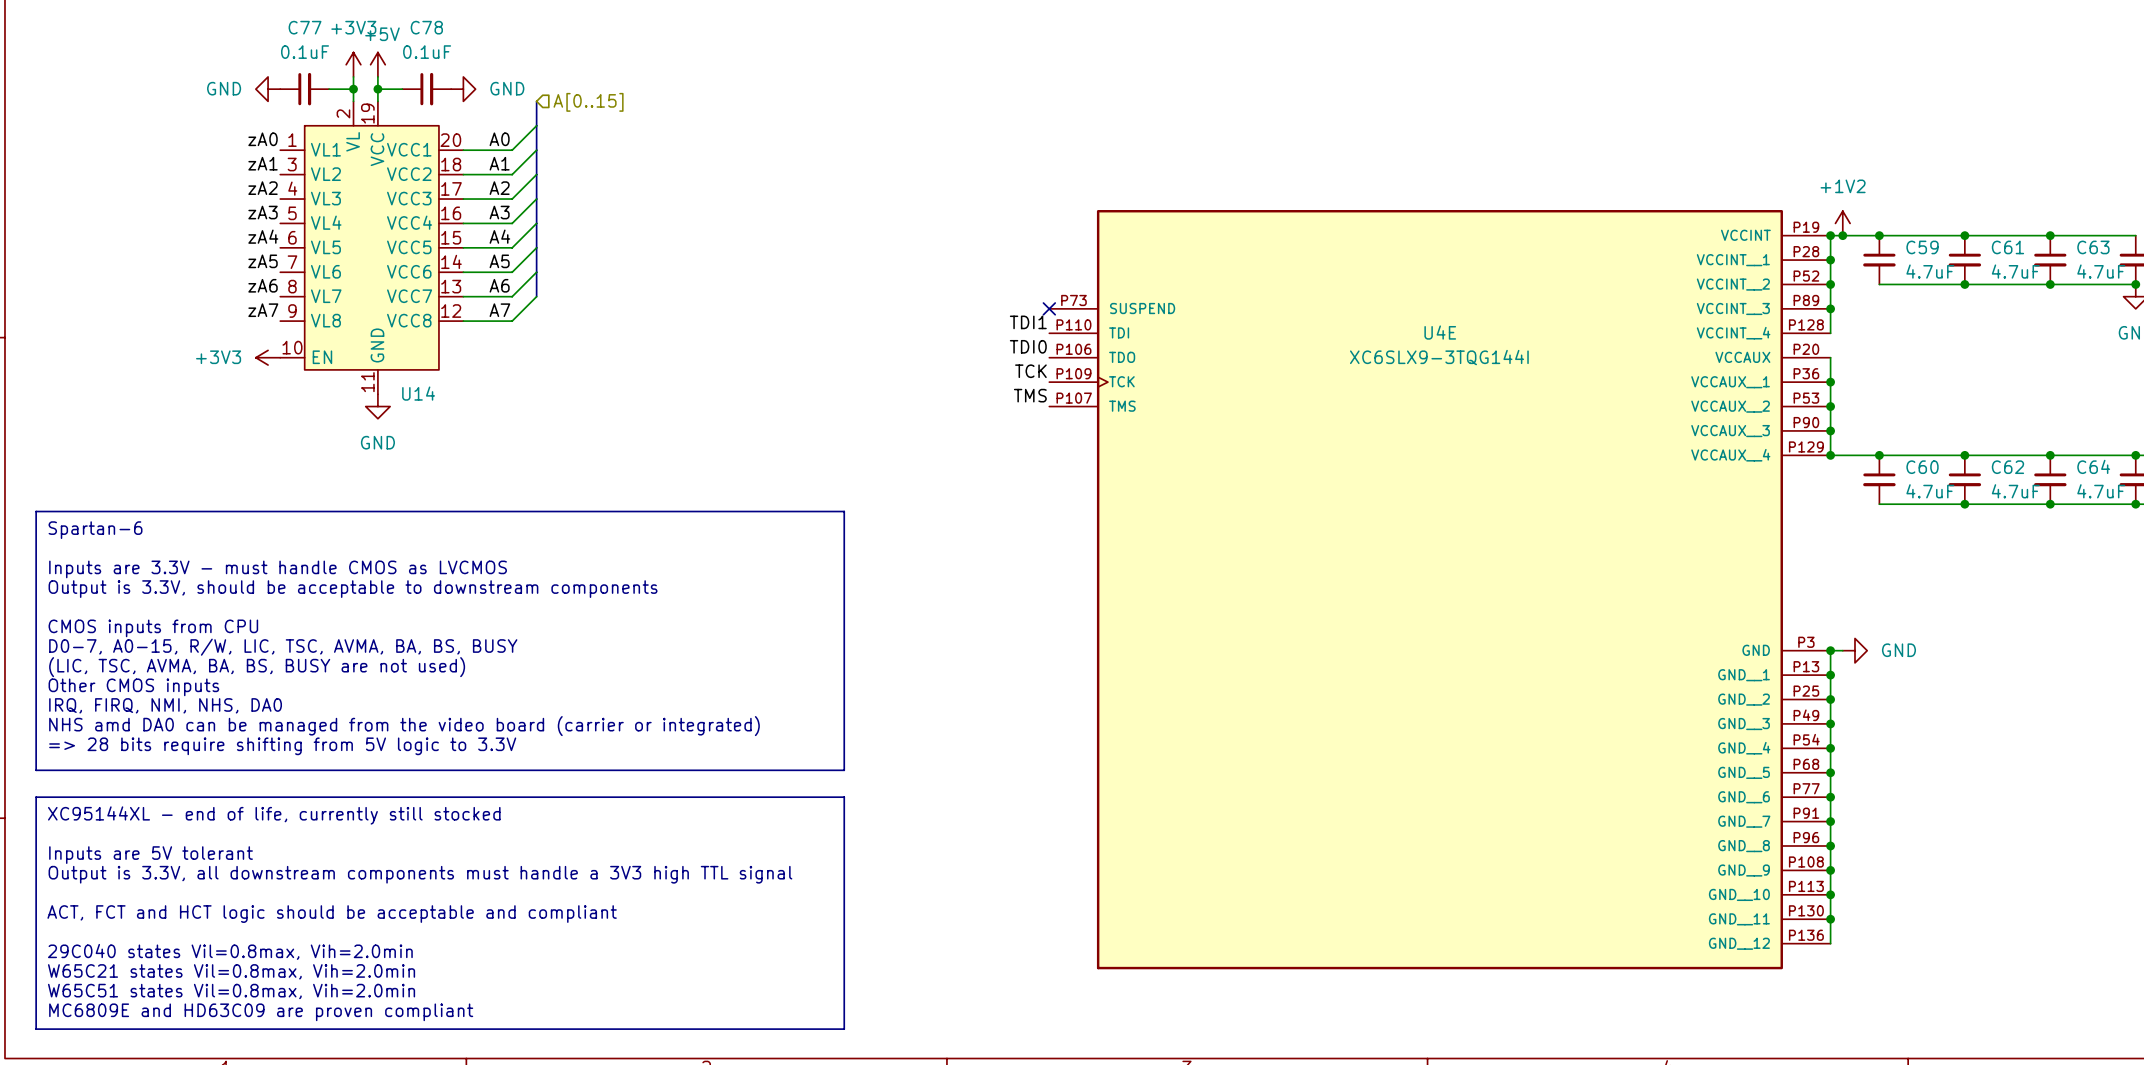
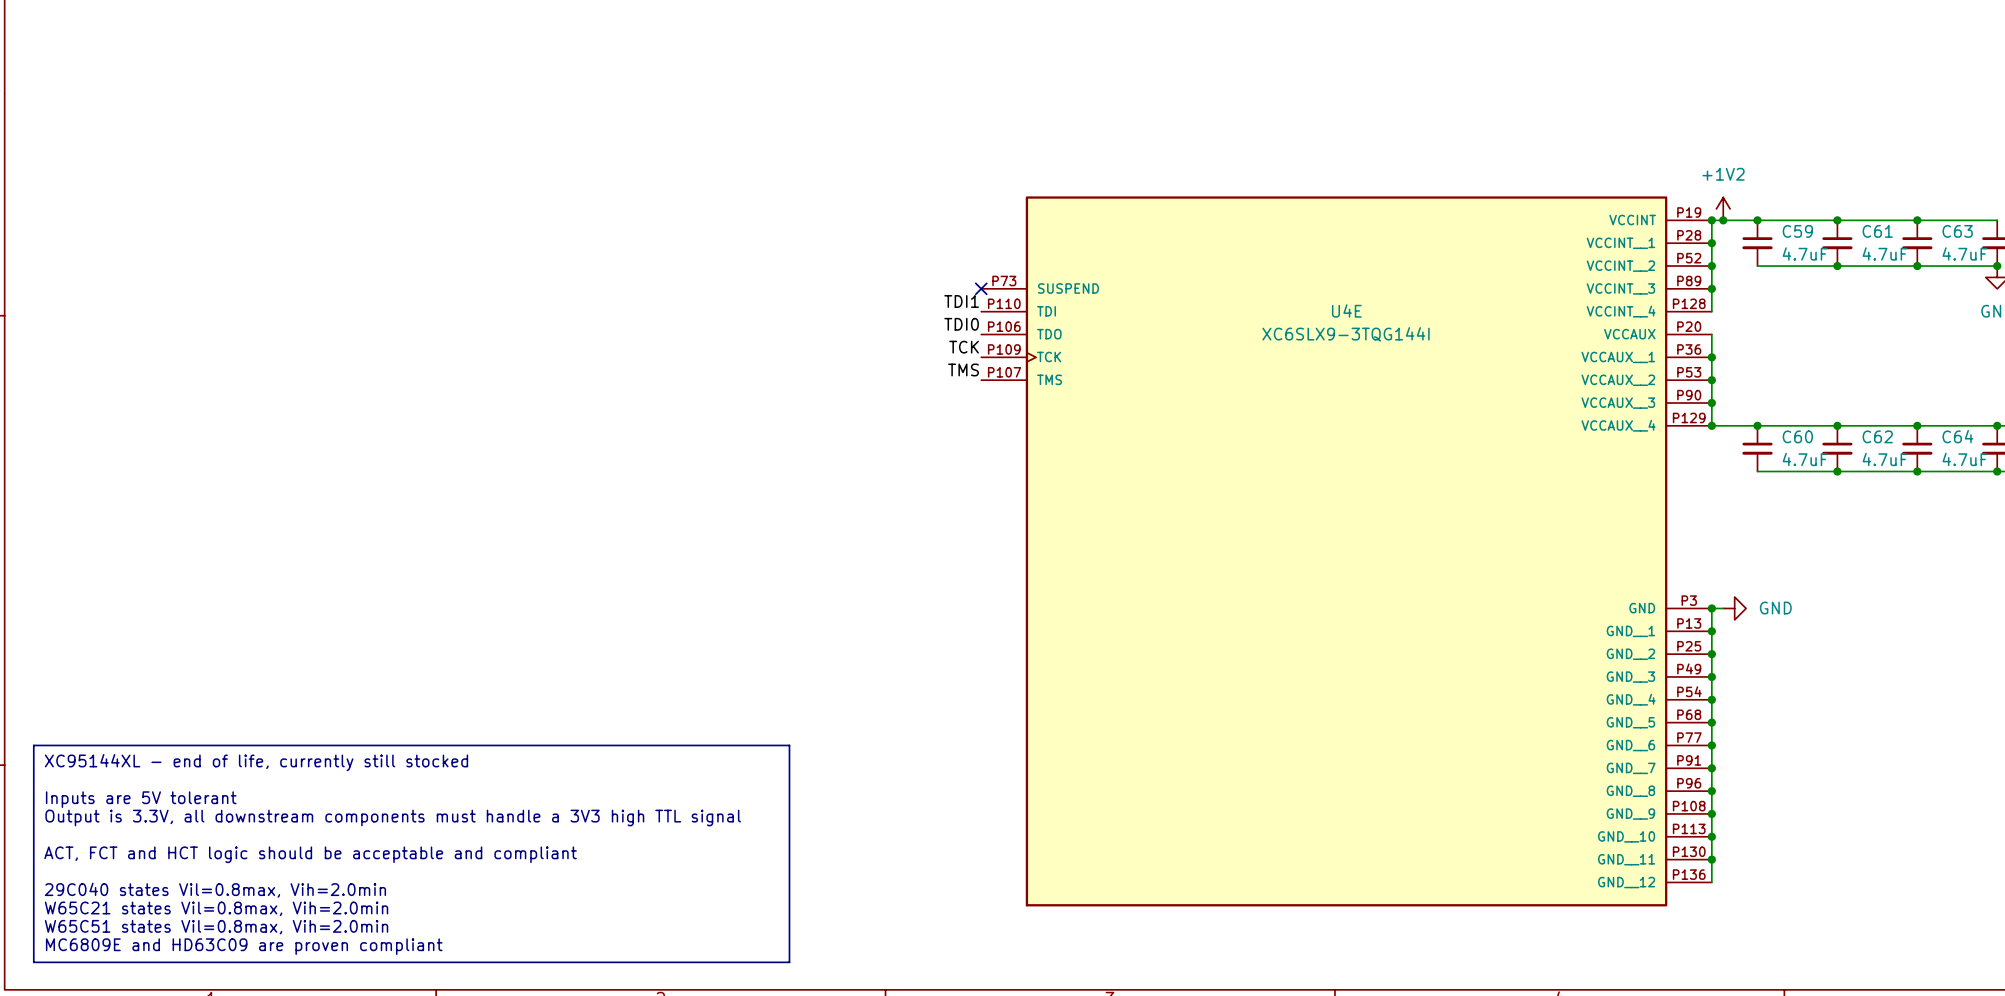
power symbol: +3V3 (353, 64) -> none
power symbol: +5V (377, 64) -> none
wire: (353, 76) (353, 101) -> none
wire: (377, 76) (377, 101) -> none
power symbol: GND (268, 89) -> none
C77: 0.1uF (304, 89) -> none
wire: (329, 89) (353, 89) -> none
junction: (353, 89) -> none
wire: (377, 89) (402, 89) -> none
junction: (377, 89) -> none
C78: 0.1uF (426, 89) -> none
power symbol: GND (463, 89) -> none
bus: (536, 101) (536, 296) -> none
hierarchical label: A[0..15] (588, 102) -> none
wire: (536, 125) (512, 150) (463, 150) -> none
label: zA0 (263, 139) -> none
label: A0 (499, 139) -> none
wire: (536, 150) (512, 174) (463, 174) -> none
label: zA1 (263, 163) -> none
label: A1 (499, 163) -> none
wire: (536, 174) (512, 199) (463, 199) -> none
label: zA2 (263, 188) -> none
label: A2 (499, 188) -> none
wire: (536, 199) (512, 223) (463, 223) -> none
label: zA3 (263, 212) -> none
label: A3 (499, 212) -> none
wire: (536, 223) (512, 247) (463, 247) -> none
label: zA4 (263, 236) -> none
label: A4 (499, 236) -> none
U14: (371, 247) -> none
wire: (536, 247) (512, 272) (463, 272) -> none
label: zA5 (263, 261) -> none
label: A5 (499, 261) -> none
wire: (536, 272) (512, 296) (463, 296) -> none
label: zA6 (263, 285) -> none
label: A6 (499, 285) -> none
wire: (536, 296) (512, 321) (463, 321) -> none
label: zA7 (263, 310) -> none
label: A7 (499, 310) -> none
power symbol: +3V3 (268, 357) -> none
power symbol: GND (377, 406) -> none
line: (36, 511) (844, 511) (844, 770) (36, 770) (36, 511) -> none
text: Spartan-6 (95, 530) -> none
text: Inputs are 3.3V - must handle CMOS as LVCMOS (278, 569) -> none
text: Output is 3.3V, should be acceptable to downstream components (353, 589) -> none
text: CMOS inputs from CPU (153, 628) -> none
text: D0-7, A0-15, R/W, LIC, TSC, AVMA, BA, BS, BUSY (283, 647) -> none
text: (LIC, TSC, AVMA, BA, BS, BUSY are not used) (257, 667) -> none
text: Other CMOS inputs (133, 687) -> none
text: IRQ, FIRQ, NMI, NHS, DA0 (165, 705) -> none
text: NHS amd DA0 can be managed from the video board (carrier or integrated) (404, 726) -> none
text: => 28 bits require shifting from 5V logic to 3.3V (282, 746) -> none

